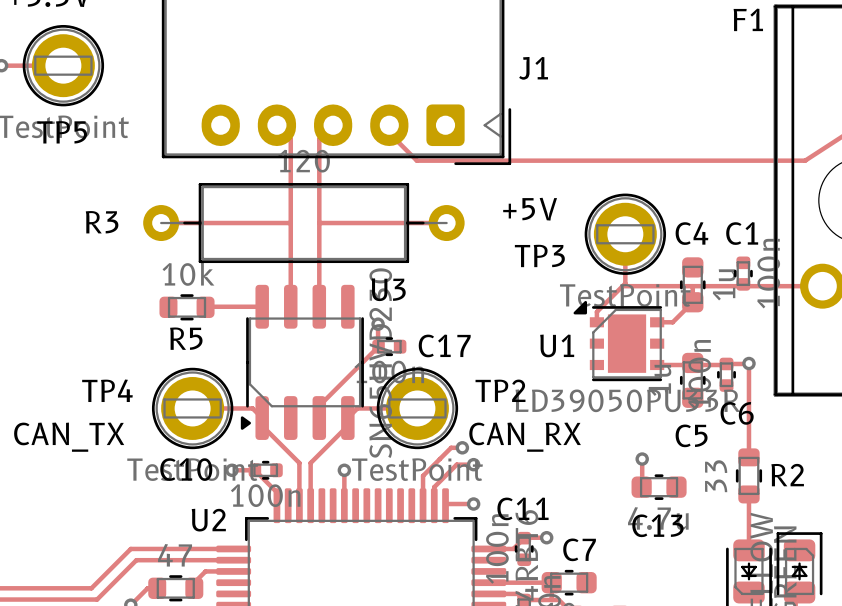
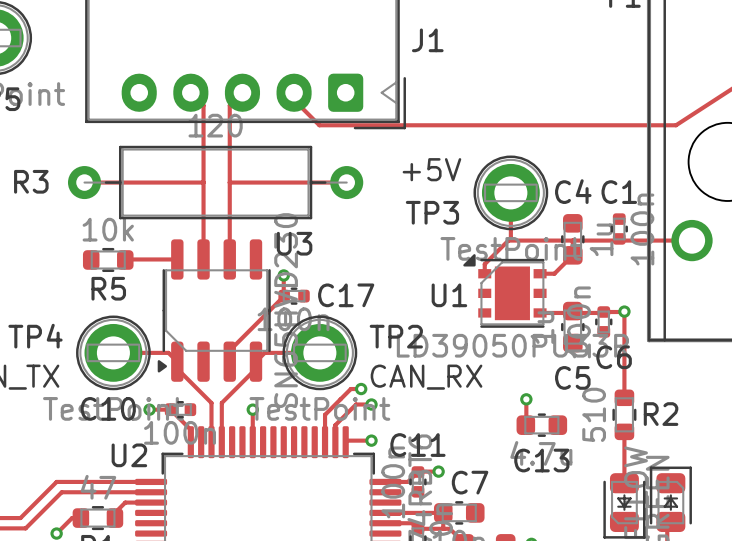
R2 value: 33 (716, 476) -> 510 (594, 414)

